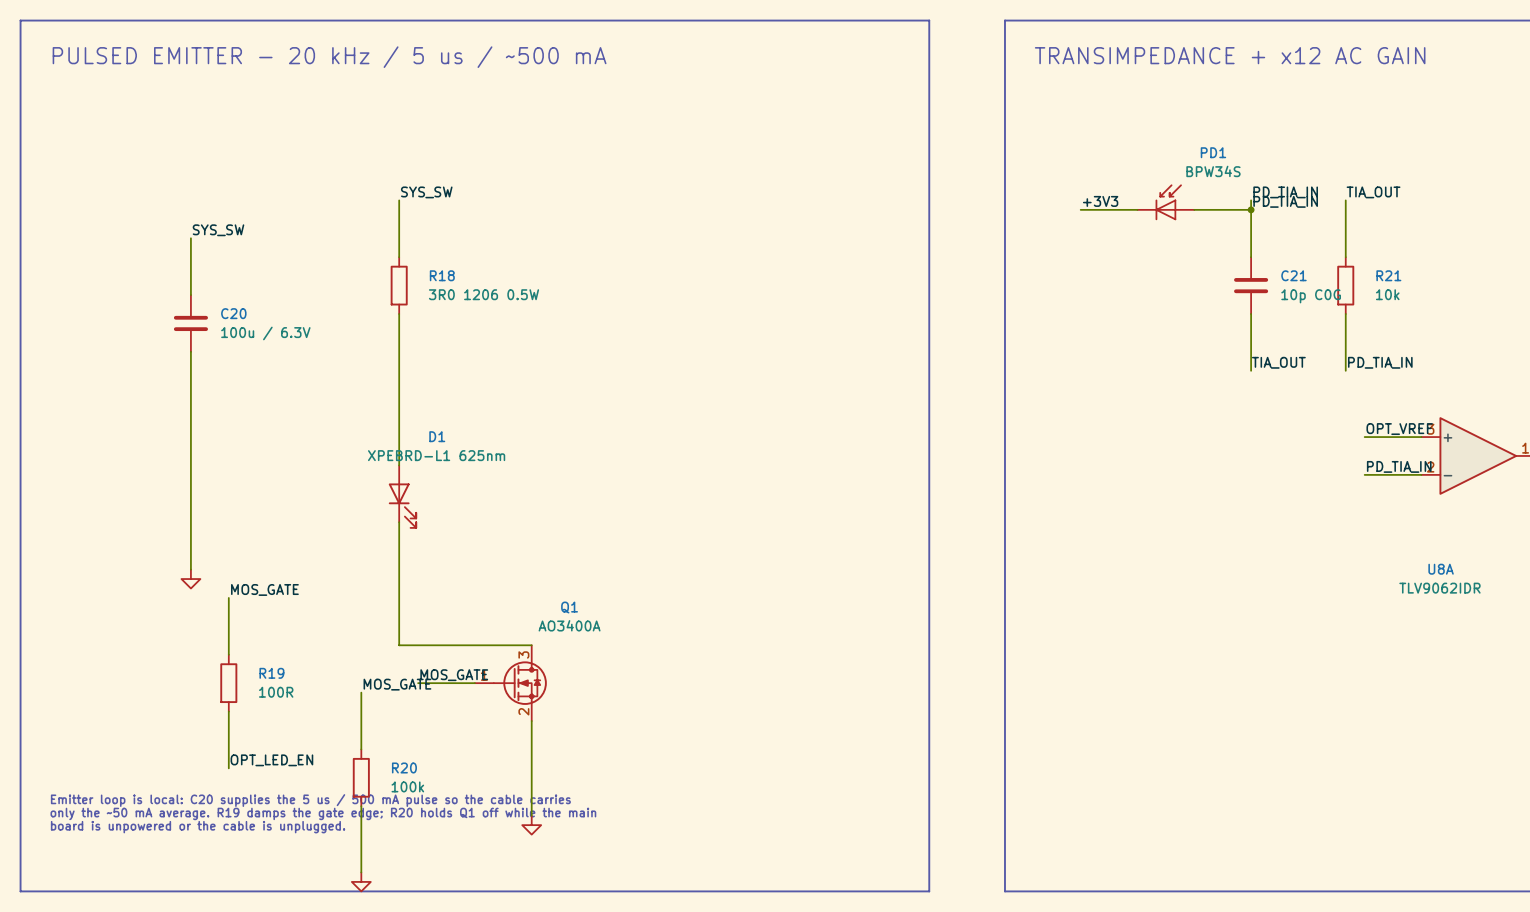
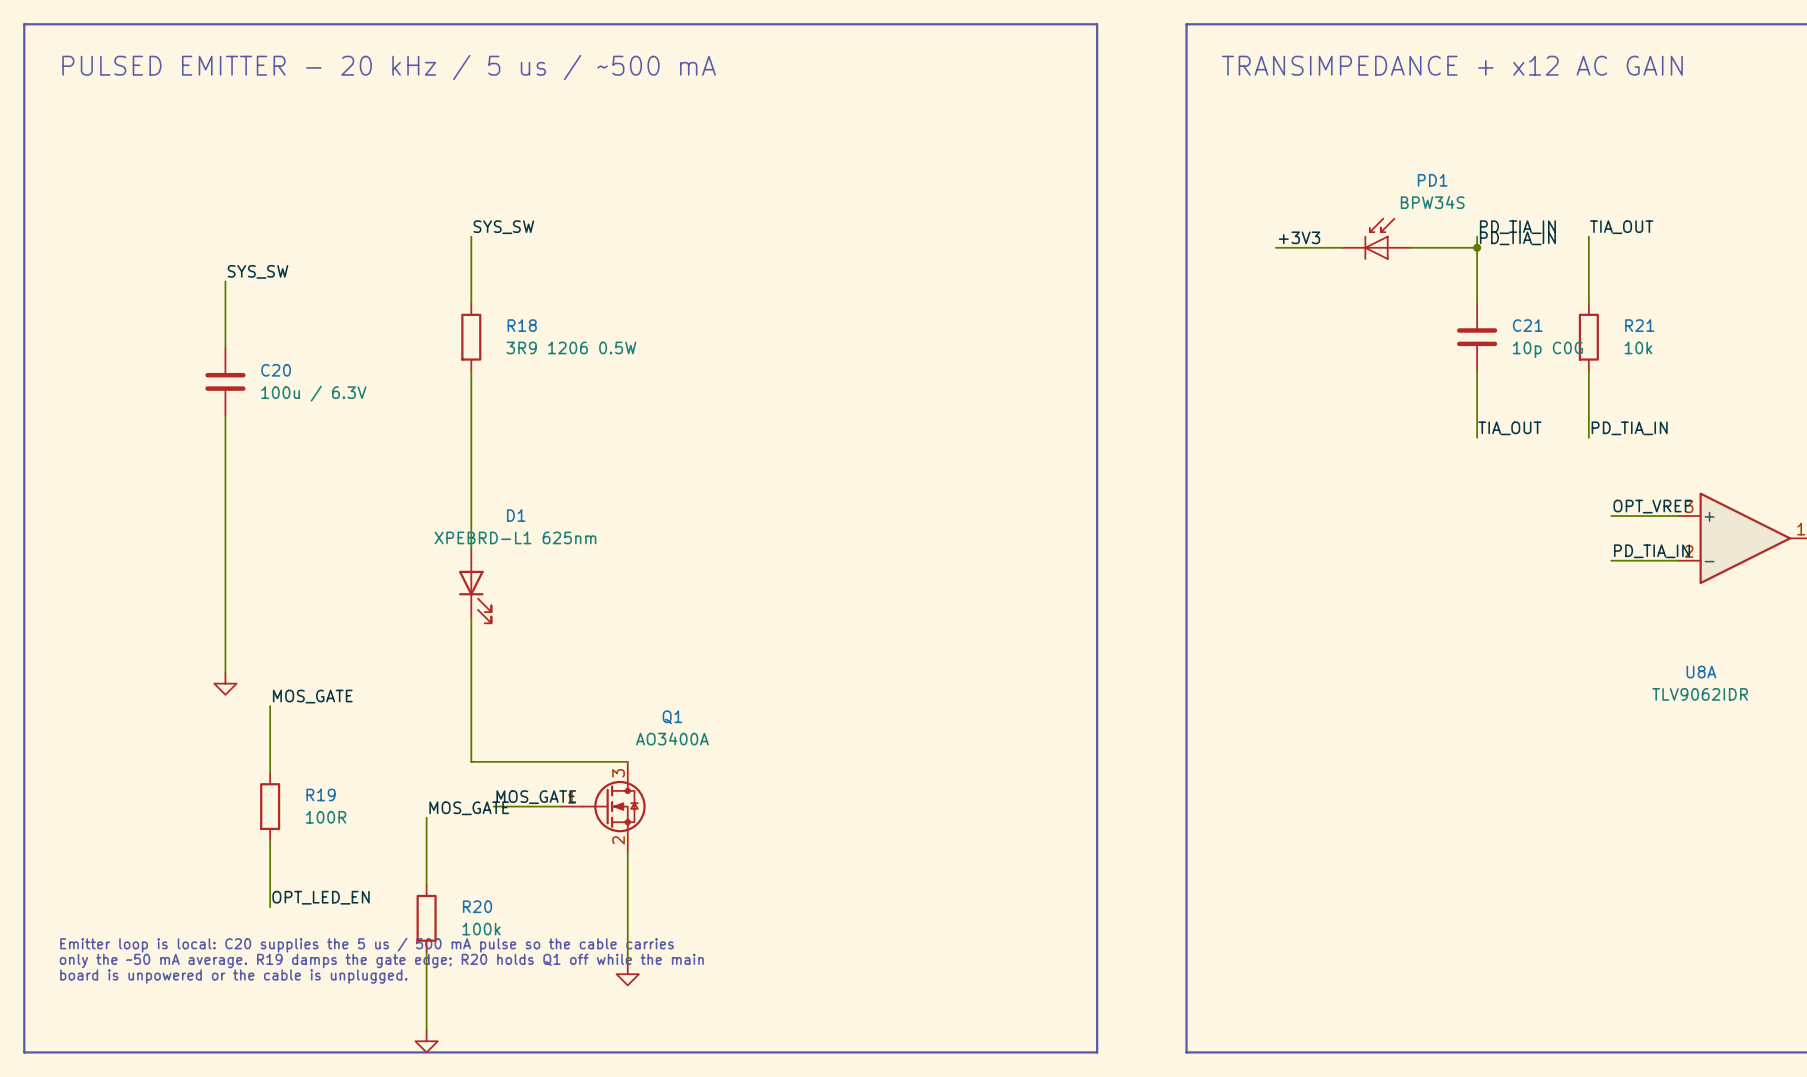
R18 value: 3R0 1206 0.5W (483, 294) -> 3R9 1206 0.5W (571, 347)

